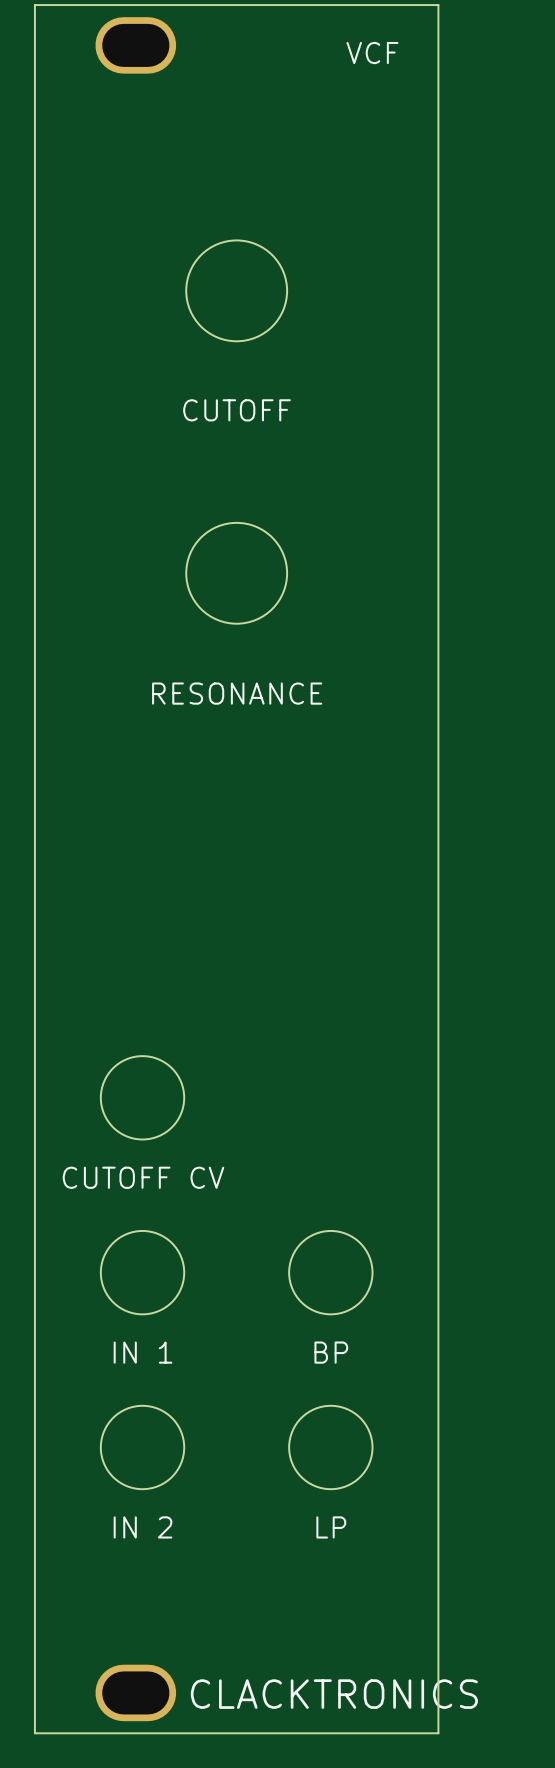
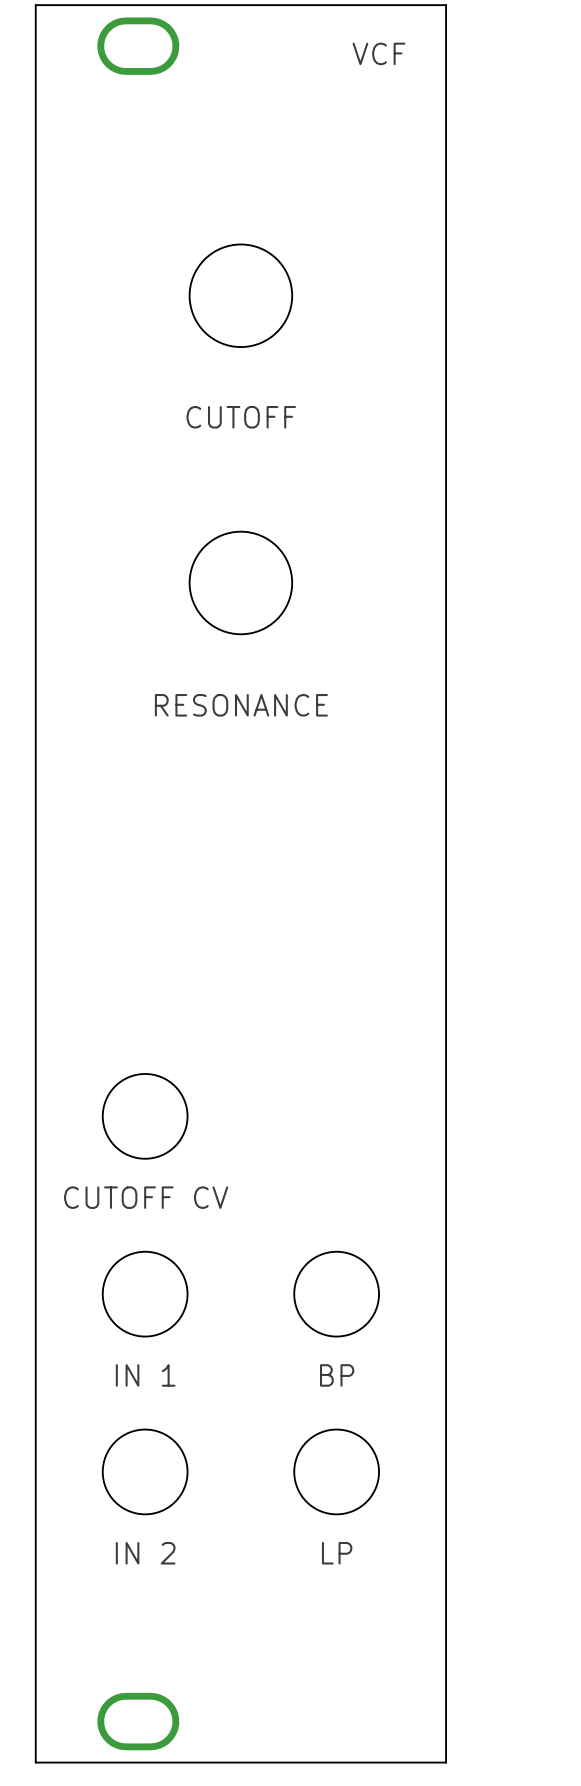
text: CLACKTRONICS (334, 1694) -> none

